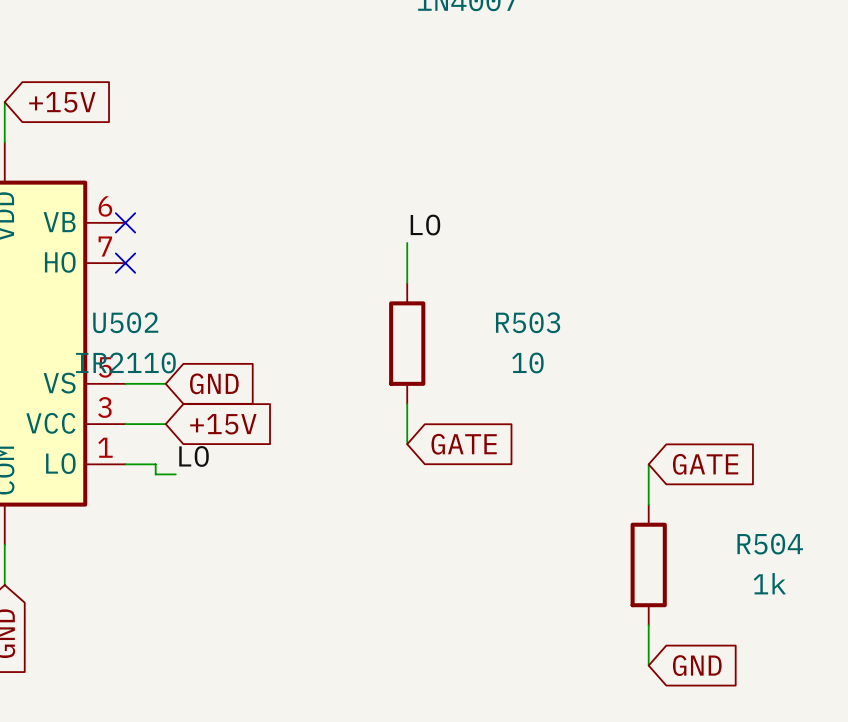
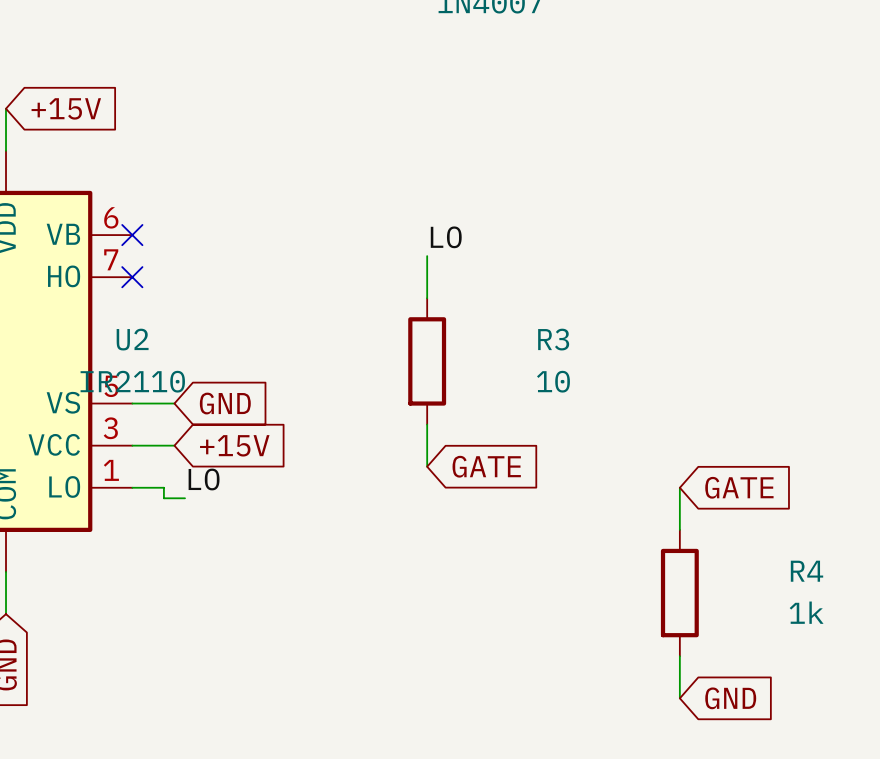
U502 name: U502 (125, 322) -> U2 (132, 339)
R503 name: R503 (528, 322) -> R3 (553, 339)
R504 name: R504 (770, 544) -> R4 (807, 571)

